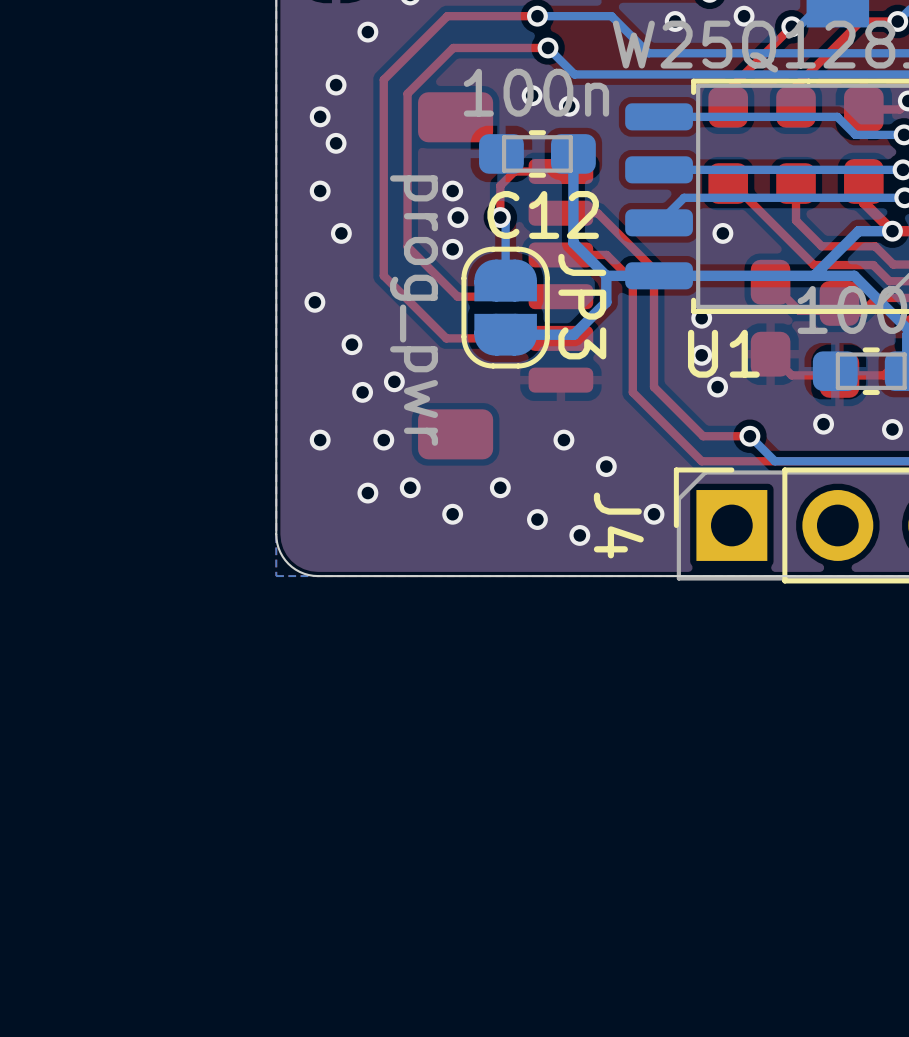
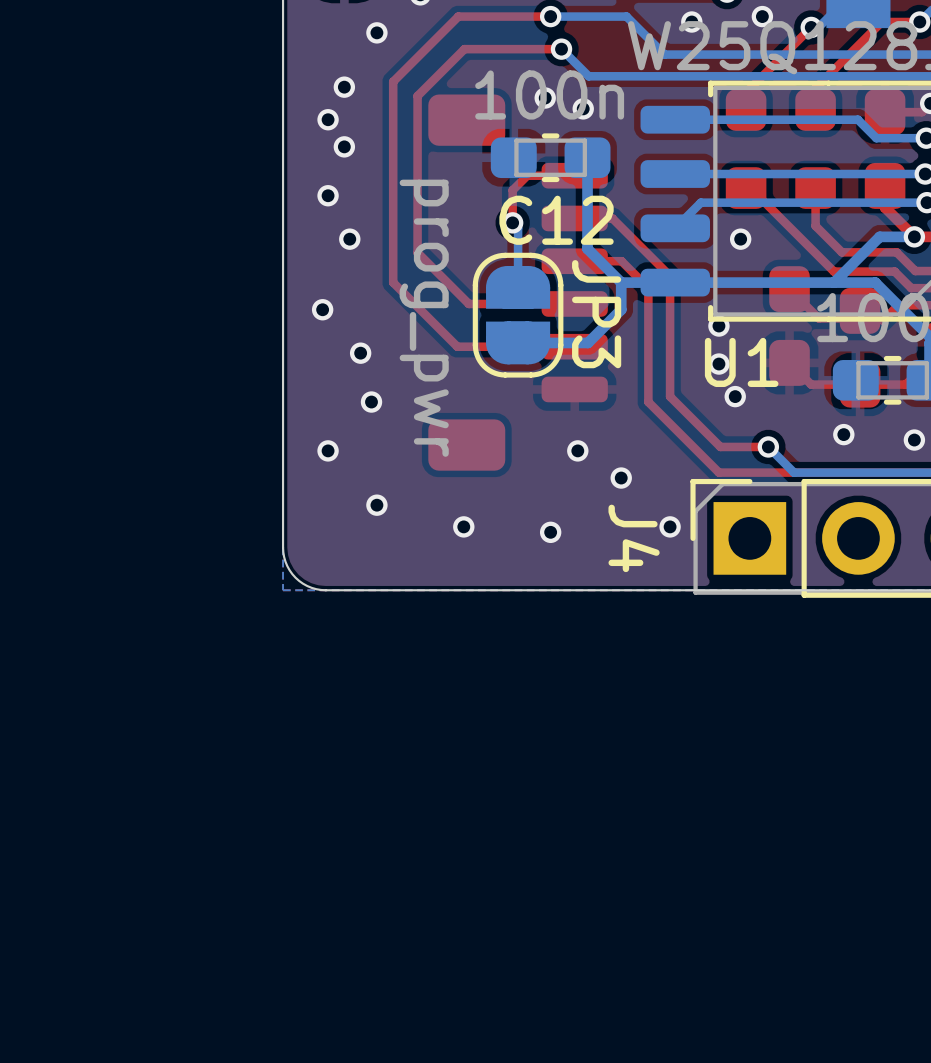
via: (452, 191) -> none
via: (457, 217) -> none
via: (452, 249) -> none
via: (394, 381) -> none
via: (383, 440) -> none
via: (410, 487) -> none
via: (500, 487) -> none
via: (579, 535) -> none

